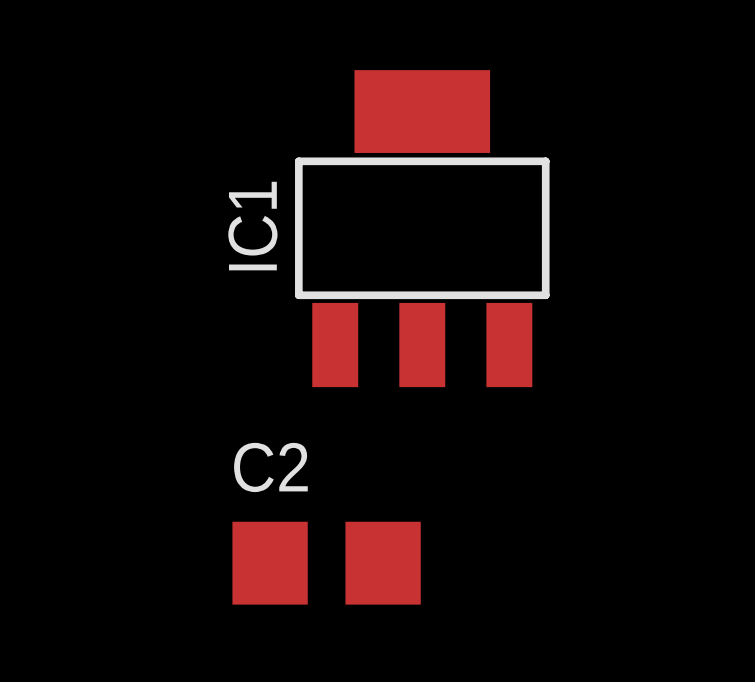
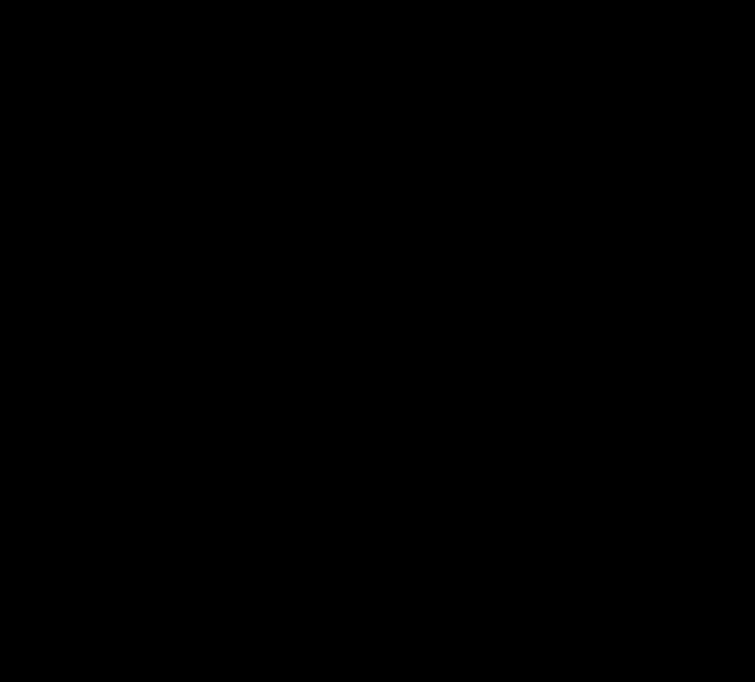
IC1: (422, 228) -> none
C2: (326, 563) -> none

